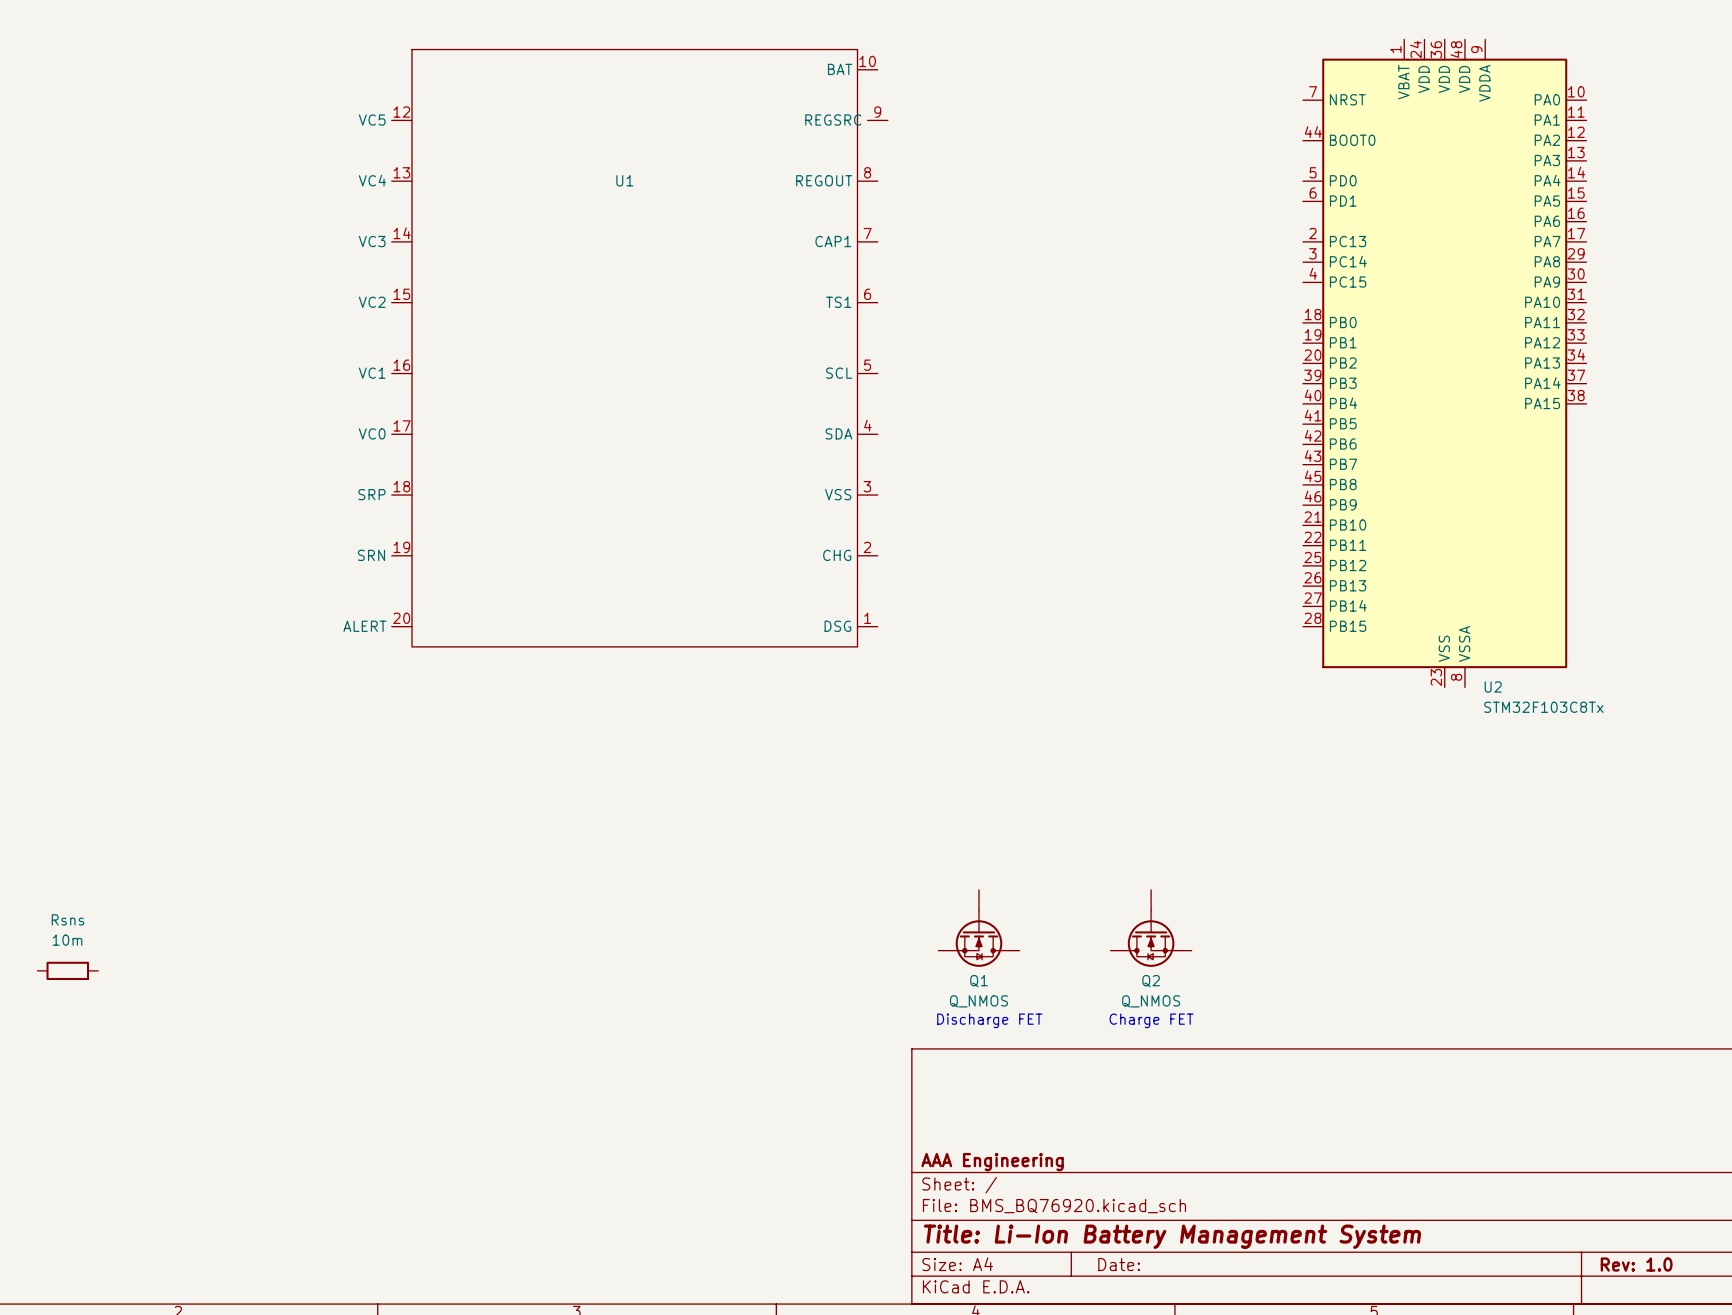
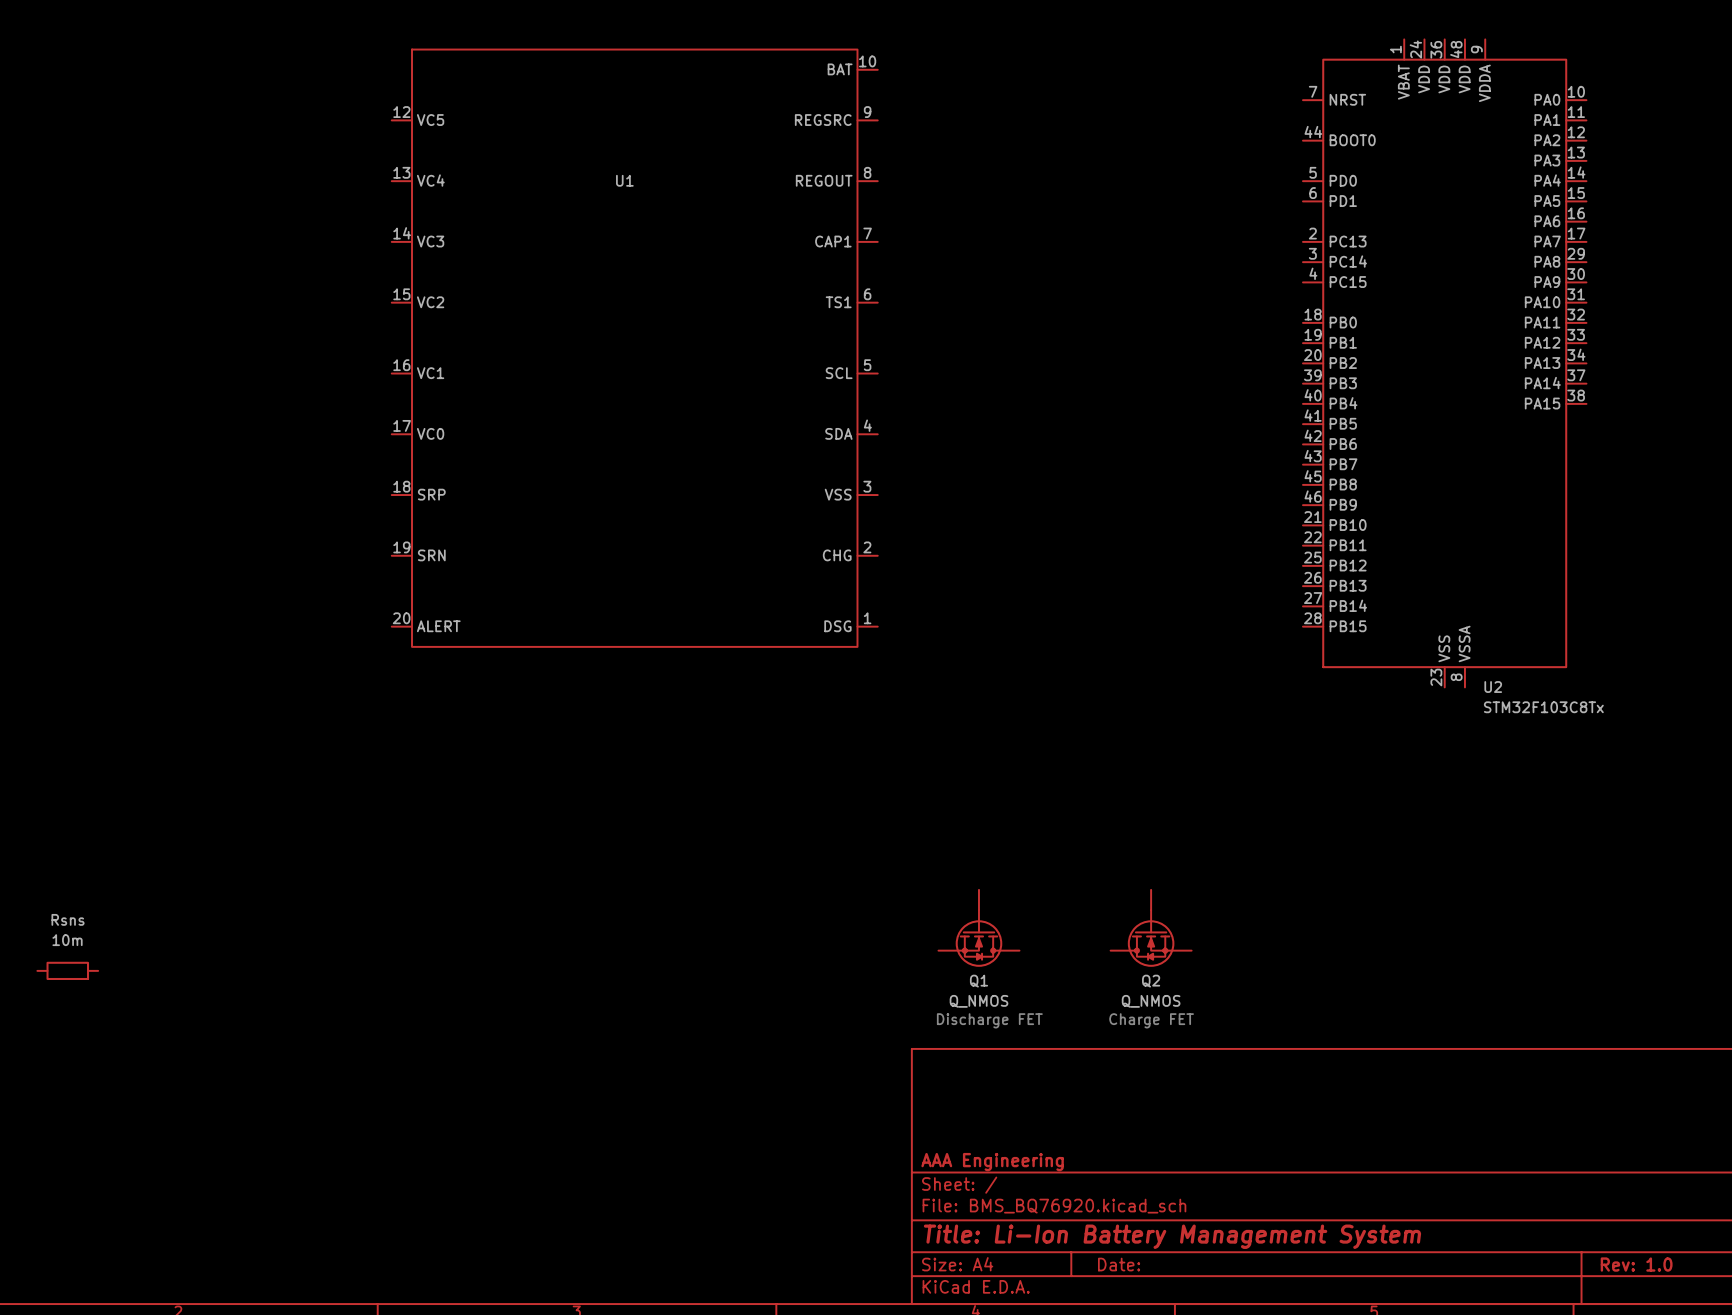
U1 symbol: [391, 49, 888, 647] -> [391, 49, 878, 647]

